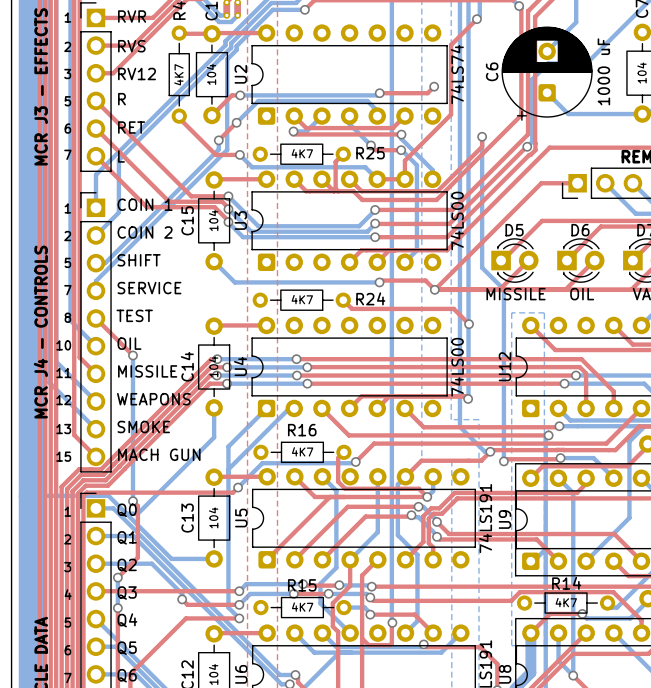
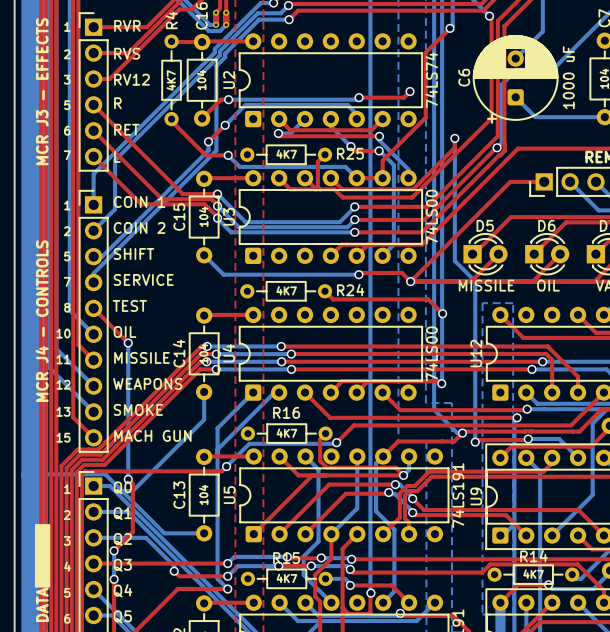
drawing: none -> [34, 524, 51, 588]

